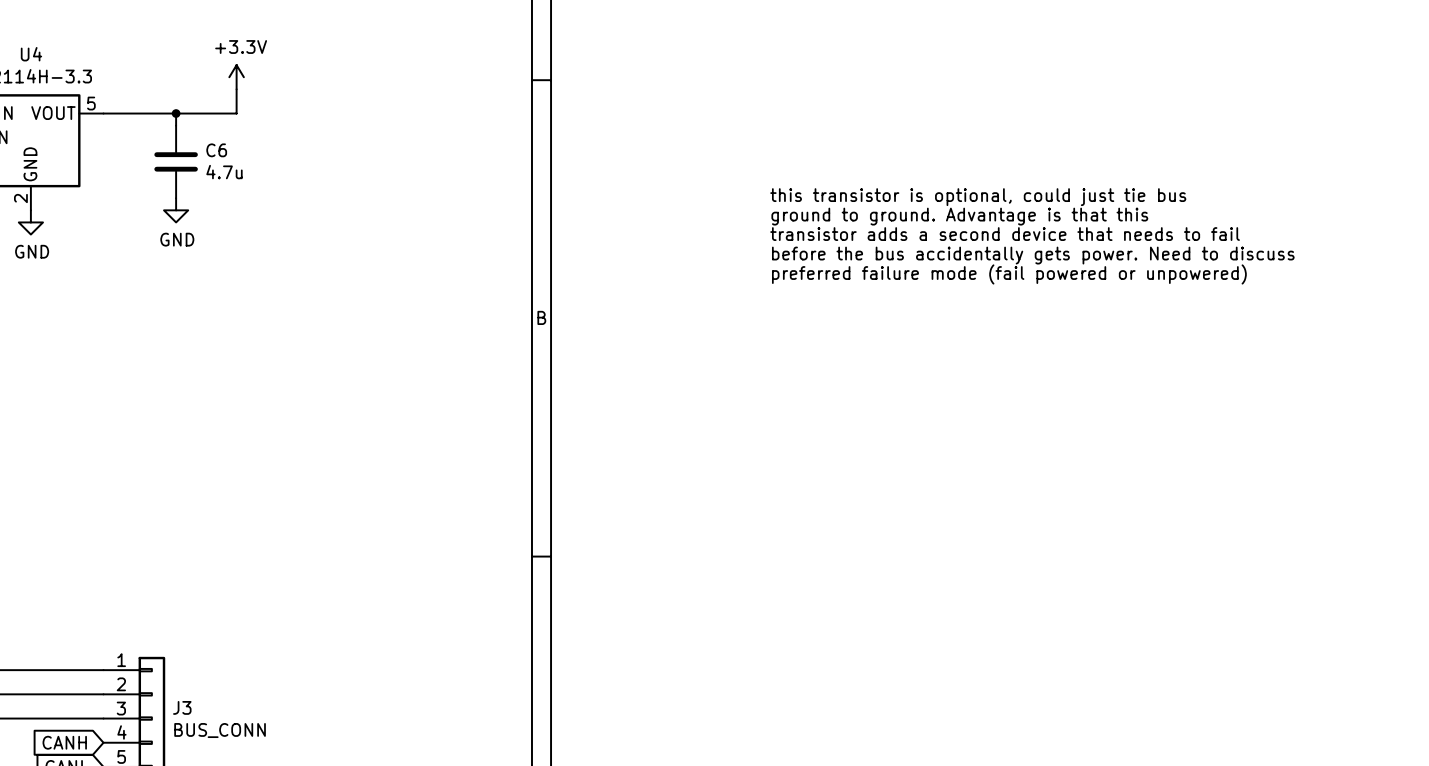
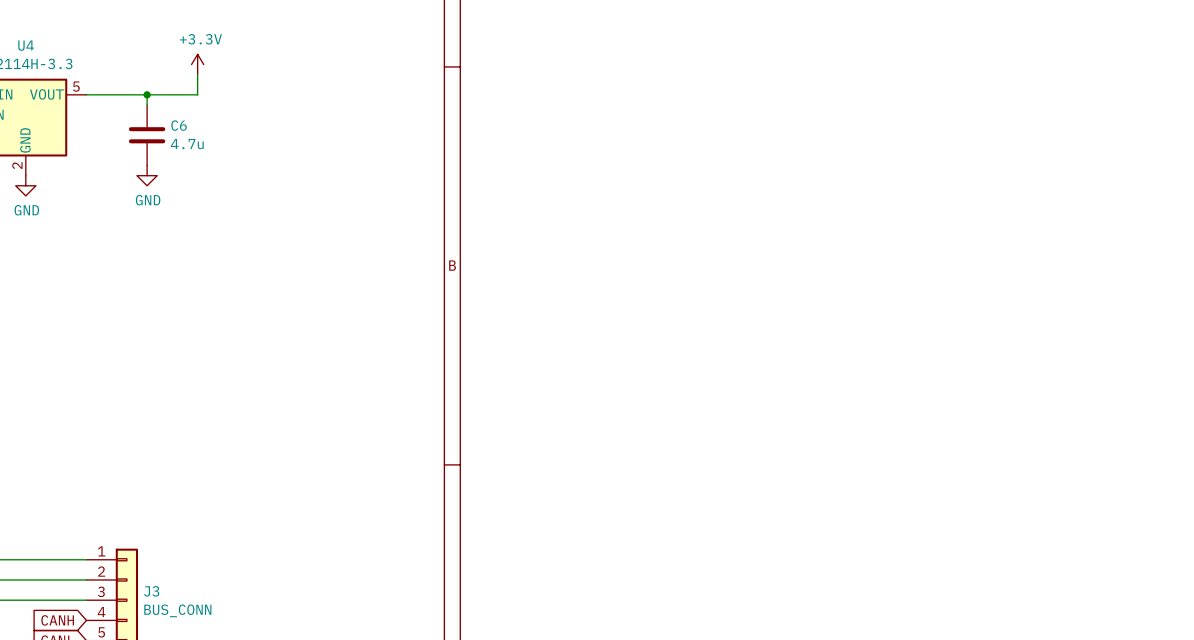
text: this transistor is optional, could just tie bus (978, 197) -> none
text: ground to ground. Advantage is that this (959, 216) -> none
text: transistor adds a second device that needs to fail (1005, 234) -> none
text: before the bus accidentally gets power. Need to discuss (1033, 255) -> none
text: preferred failure mode (fail powered or unpowered) (1009, 274) -> none

